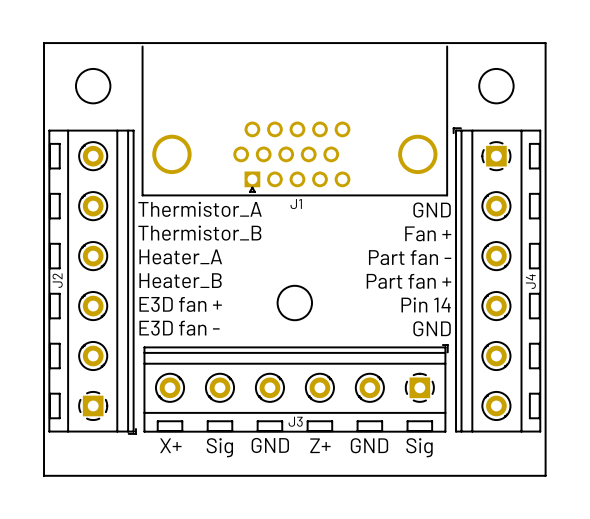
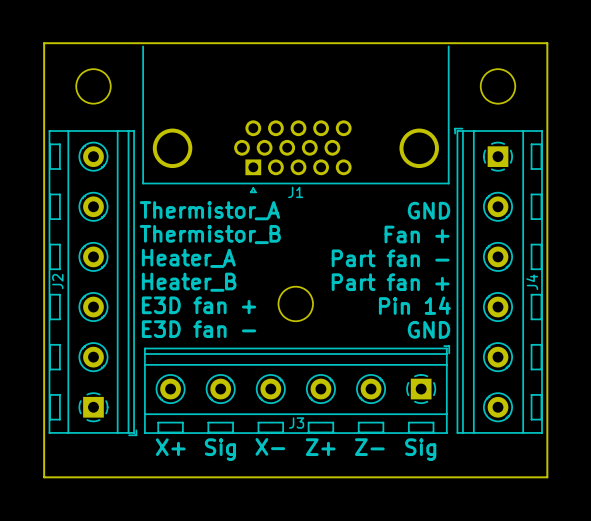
J1 footprint: [141, 45, 448, 197] -> [142, 45, 450, 193]
text: GND (270, 445) -> X- (270, 446)
text: GND (369, 445) -> Z- (369, 447)

